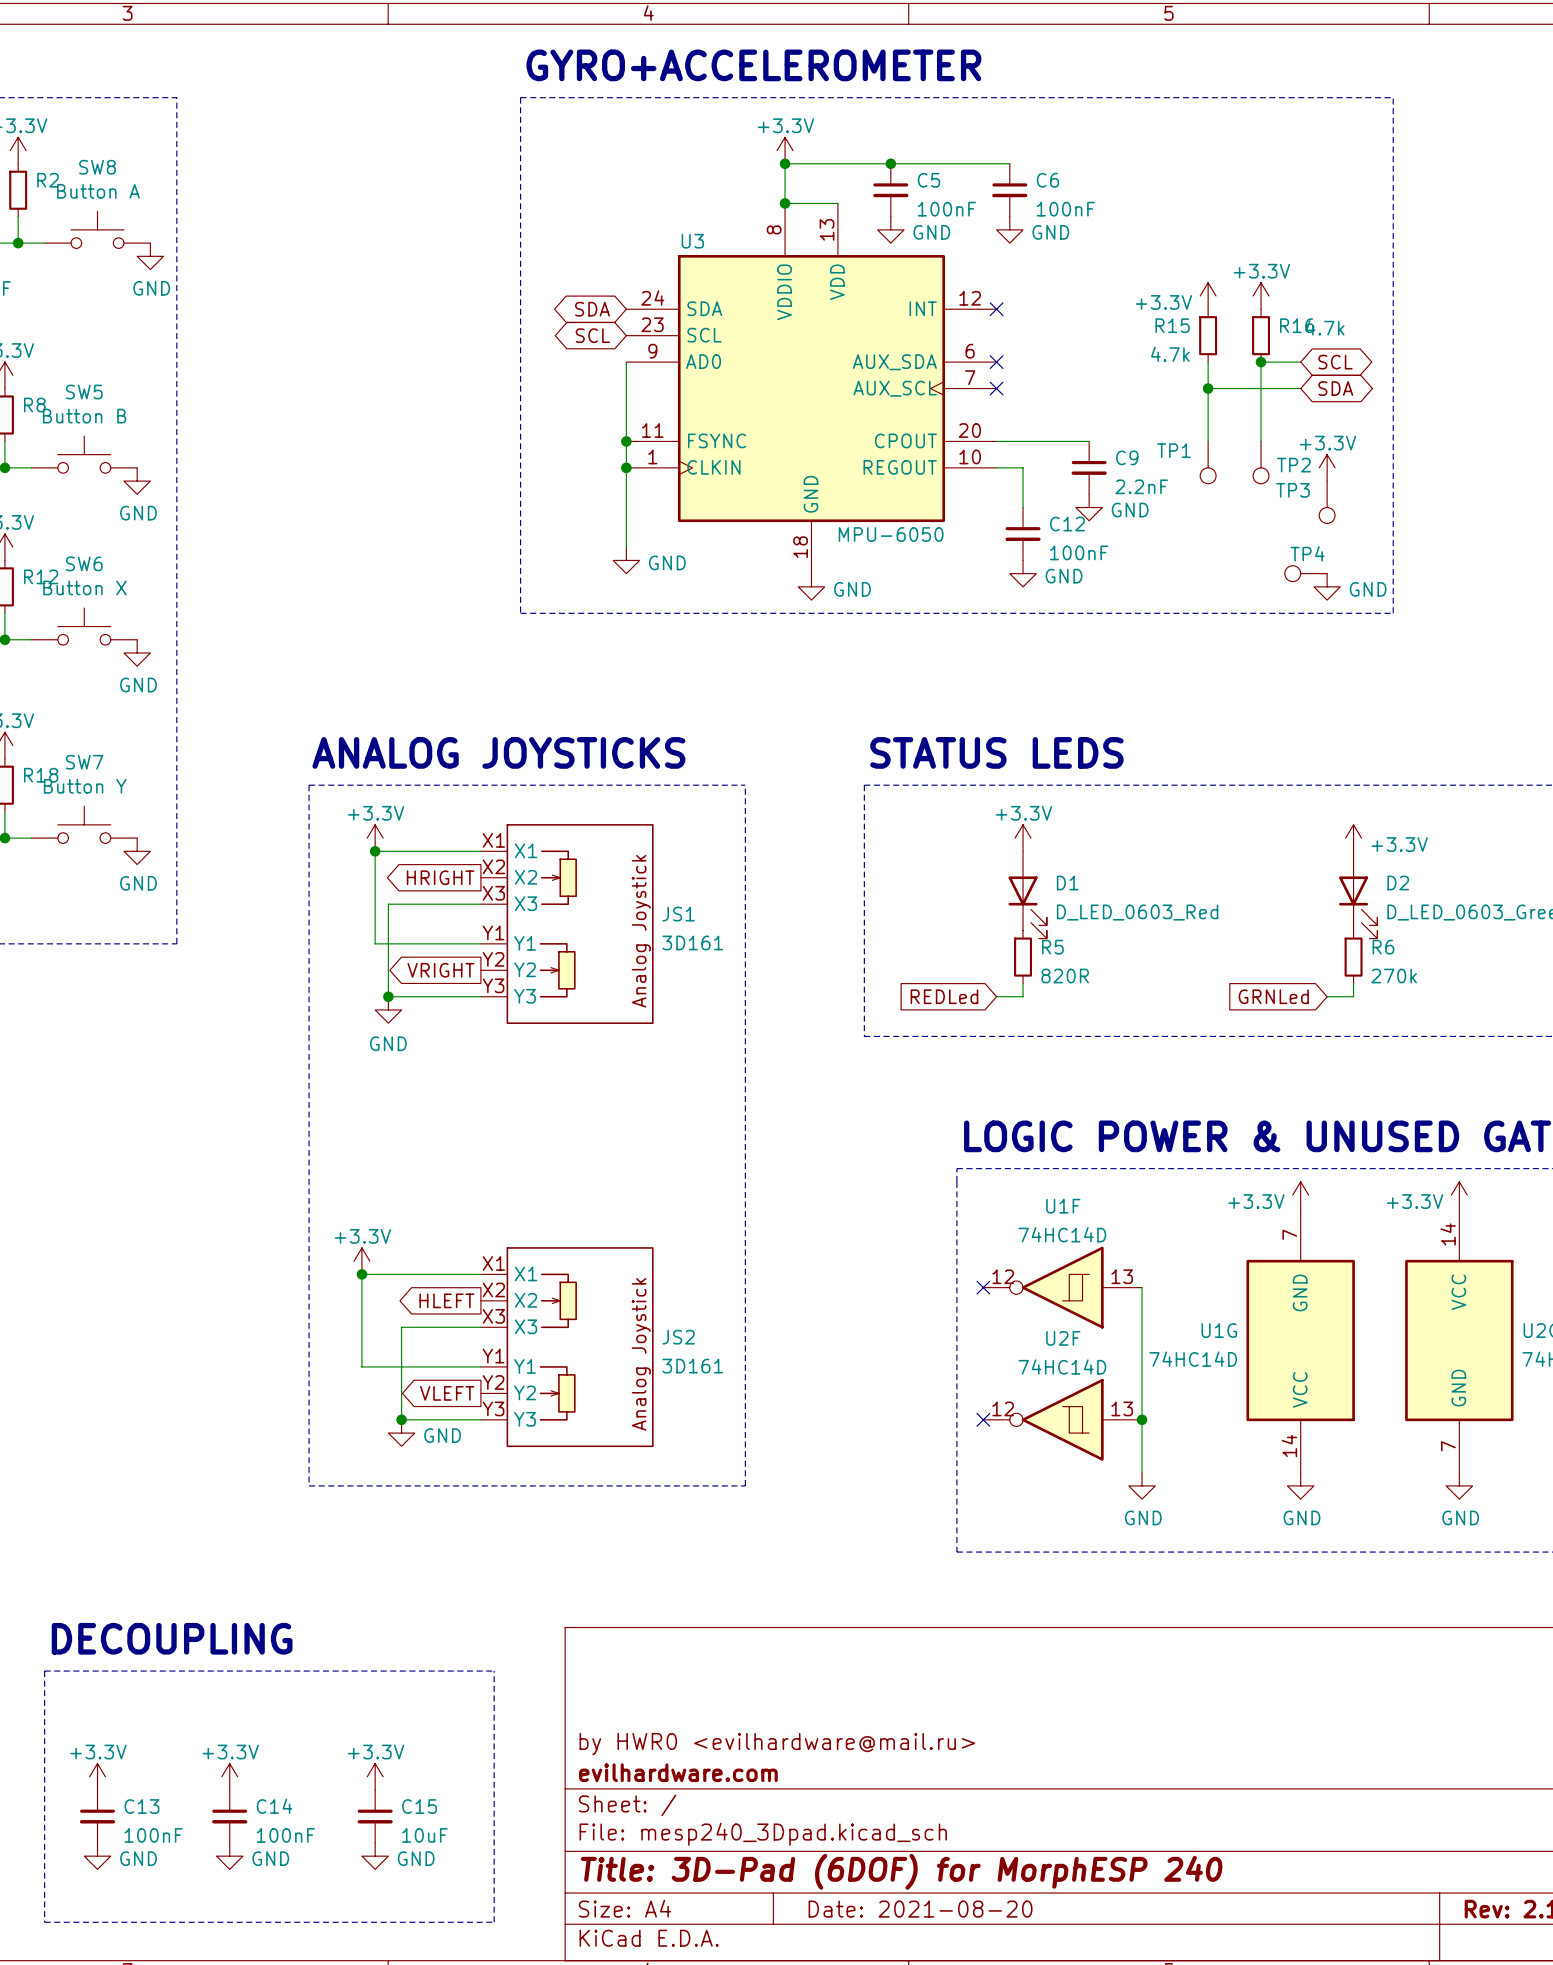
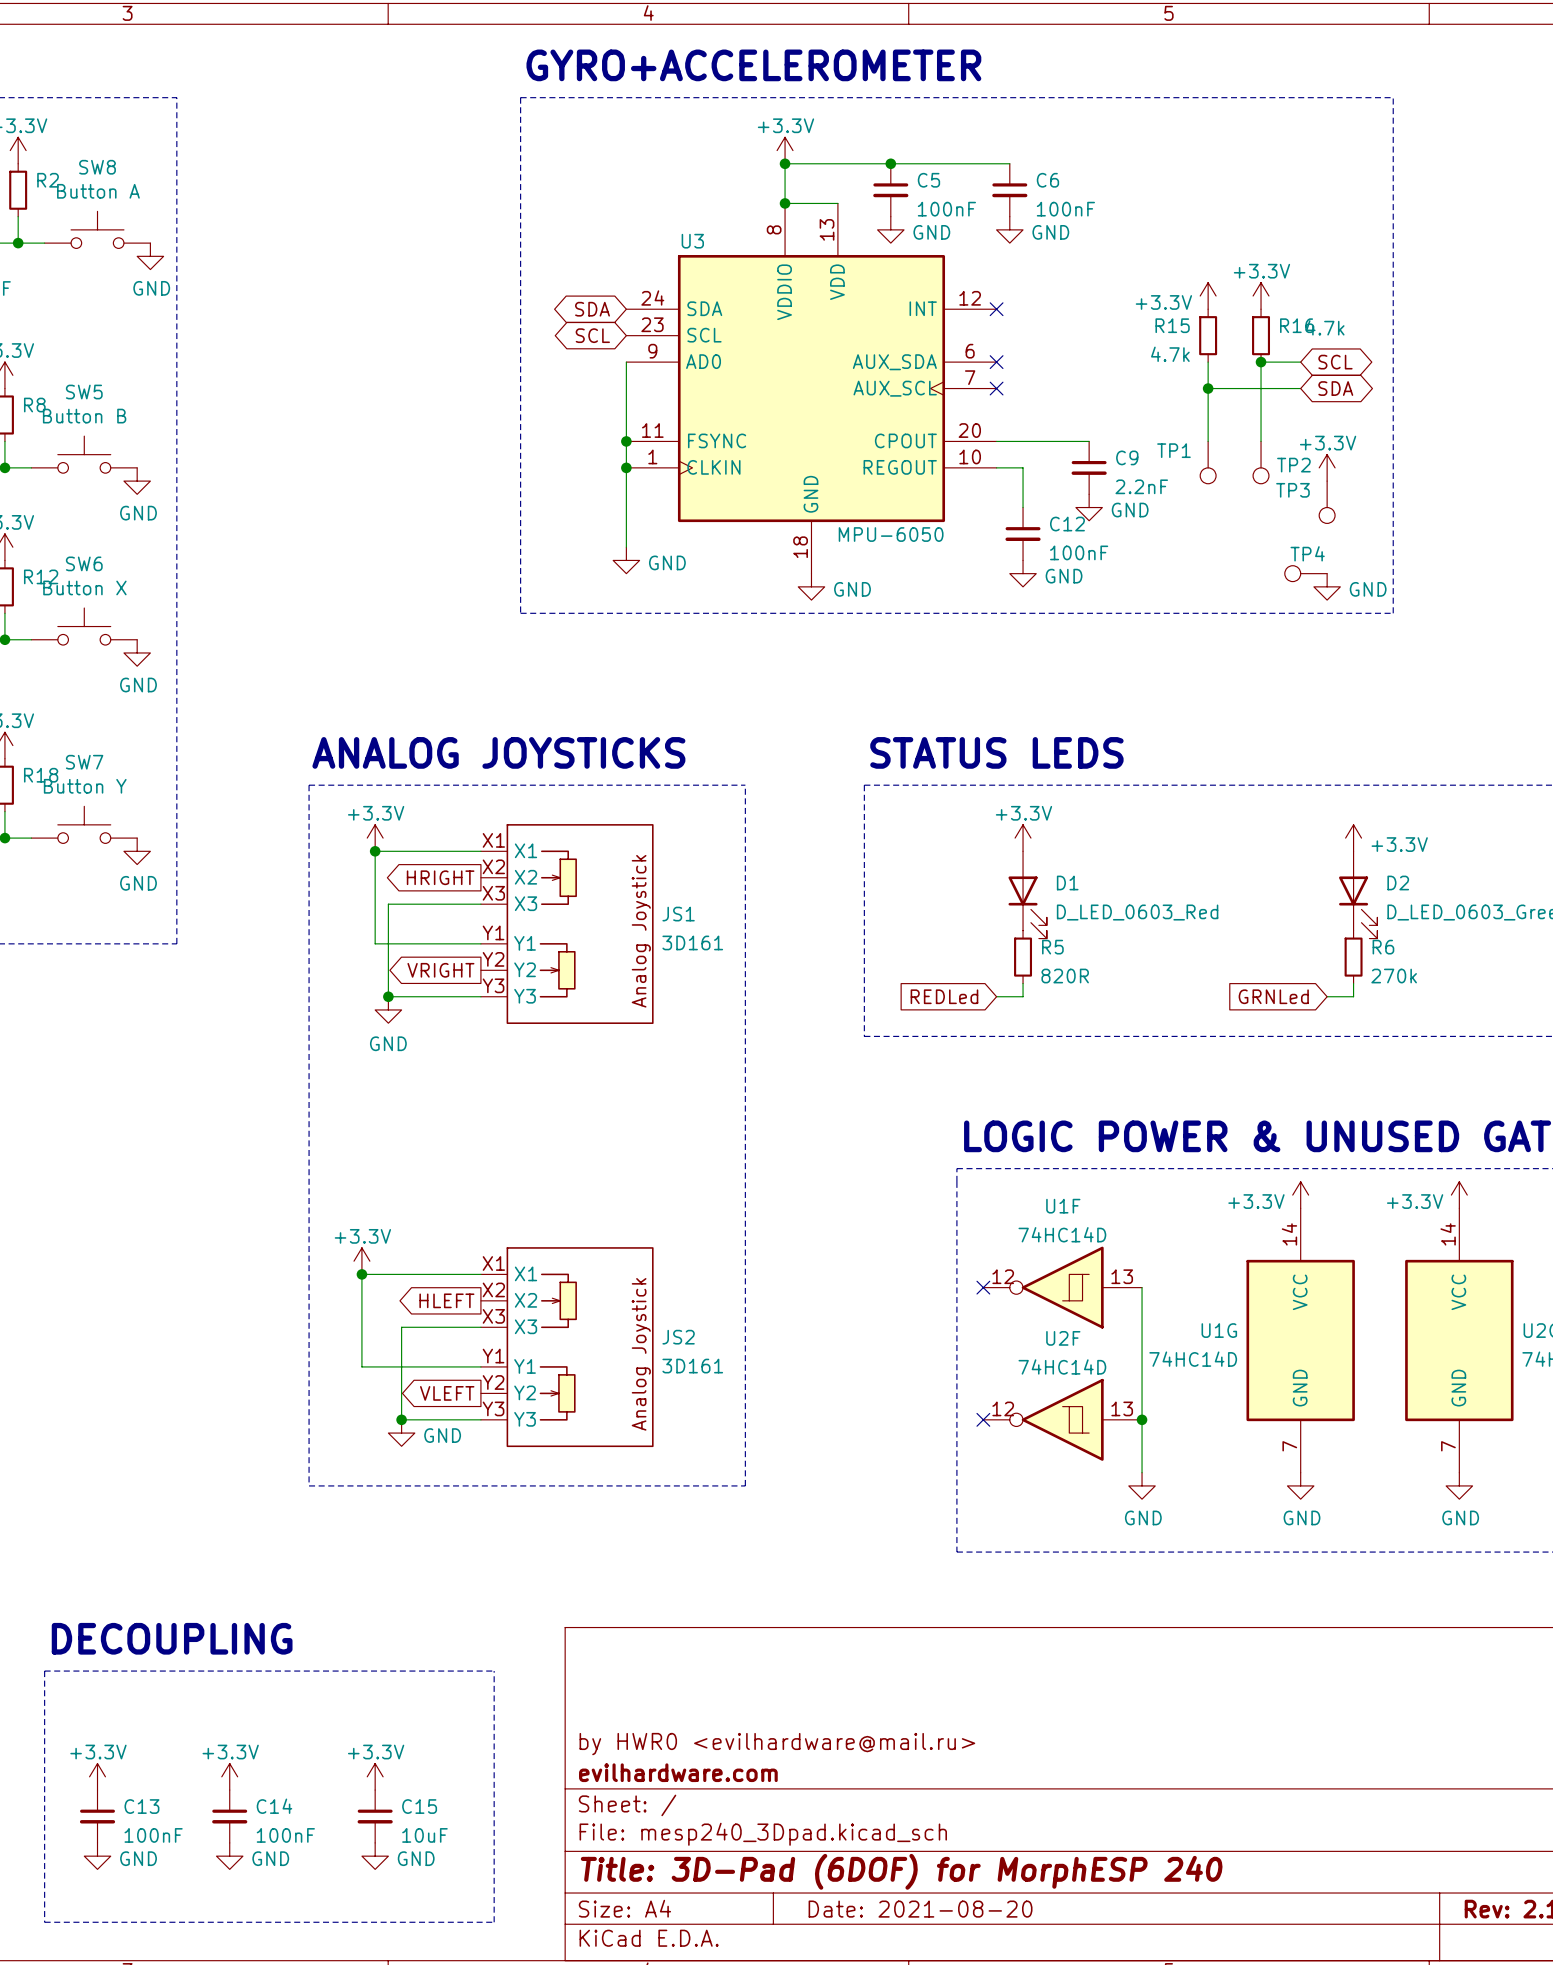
U1G rotation: 0° (1300, 1340) -> 180° (1300, 1340)

